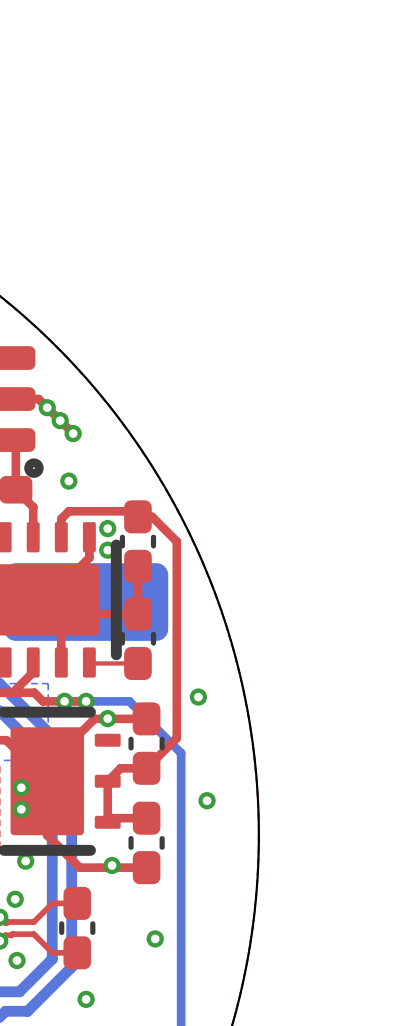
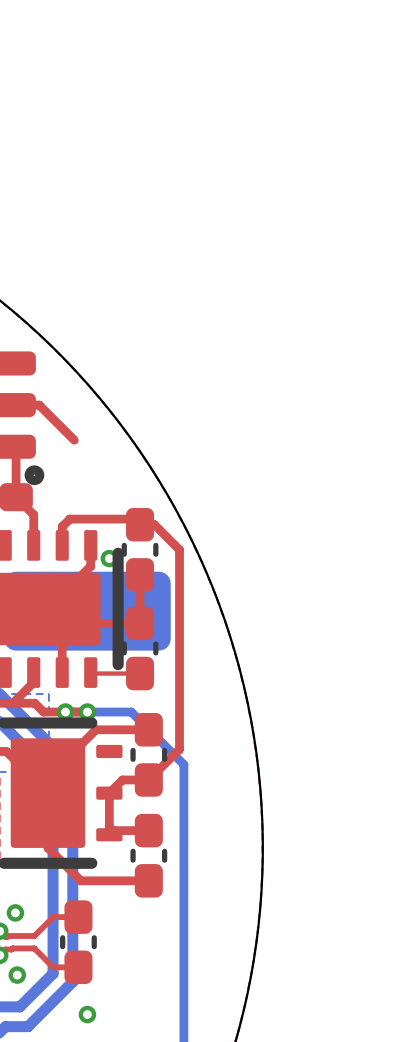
via: (47, 407) -> none
via: (60, 420) -> none
via: (73, 433) -> none
via: (68, 481) -> none
via: (107, 528) -> none
via: (198, 697) -> none
via: (107, 718) -> none
via: (21, 787) -> none
via: (207, 800) -> none
via: (21, 809) -> none
via: (25, 861) -> none
via: (112, 865) -> none
via: (155, 938) -> none

